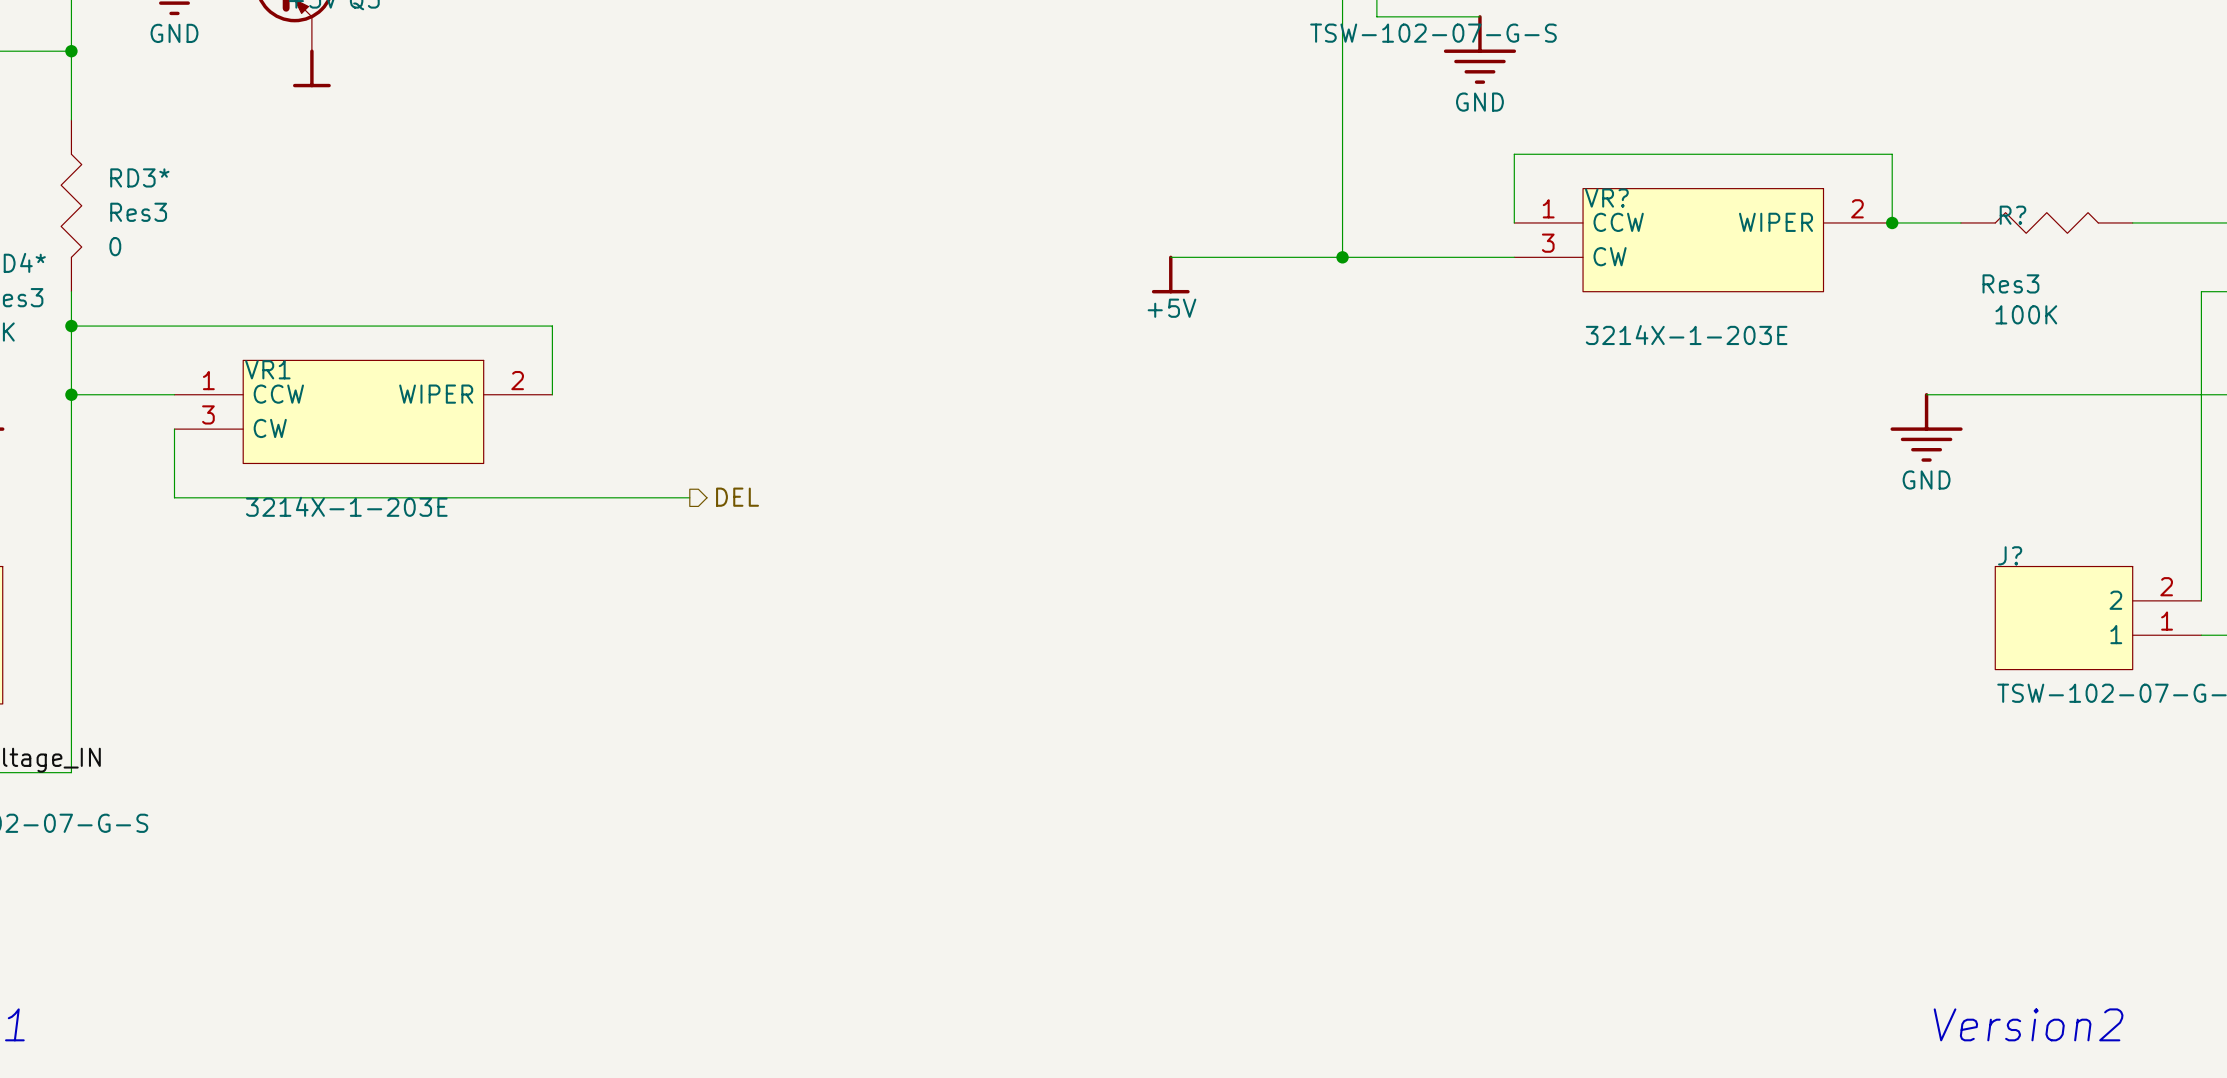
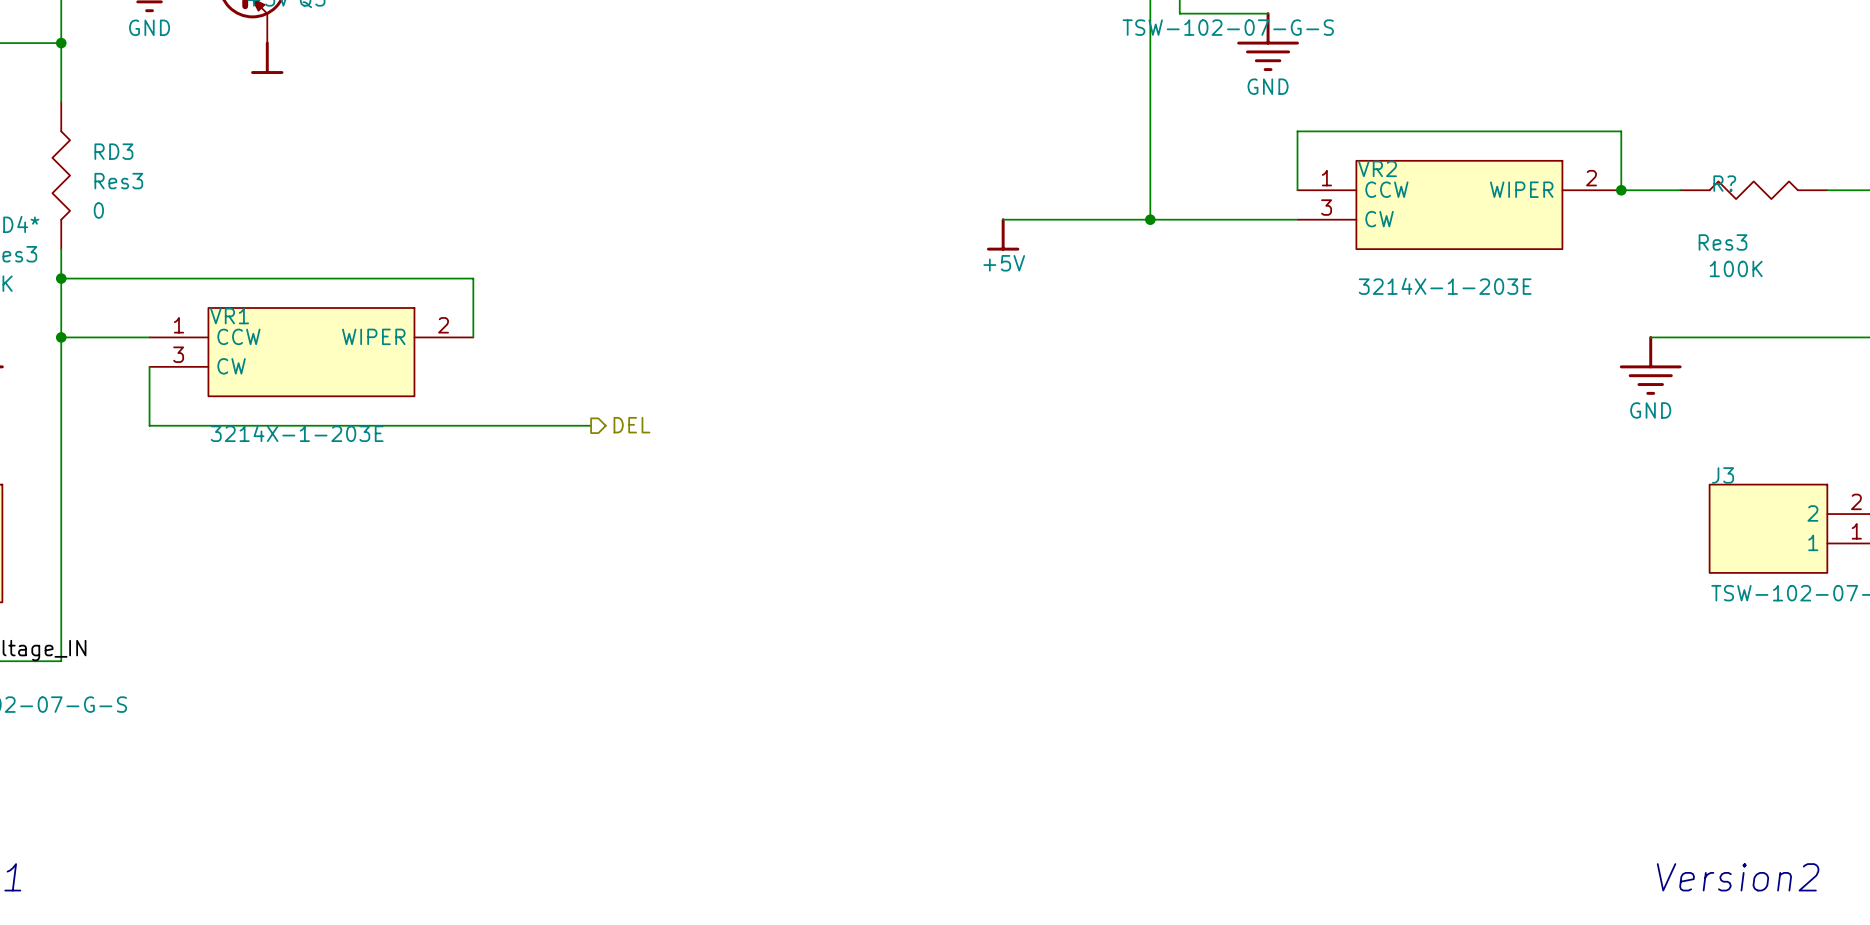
RD3* name: RD3* (139, 177) -> RD3 (113, 151)
VR? name: VR? (1606, 198) -> VR2 (1377, 168)
J? name: J? (2010, 555) -> J3 (1723, 475)

